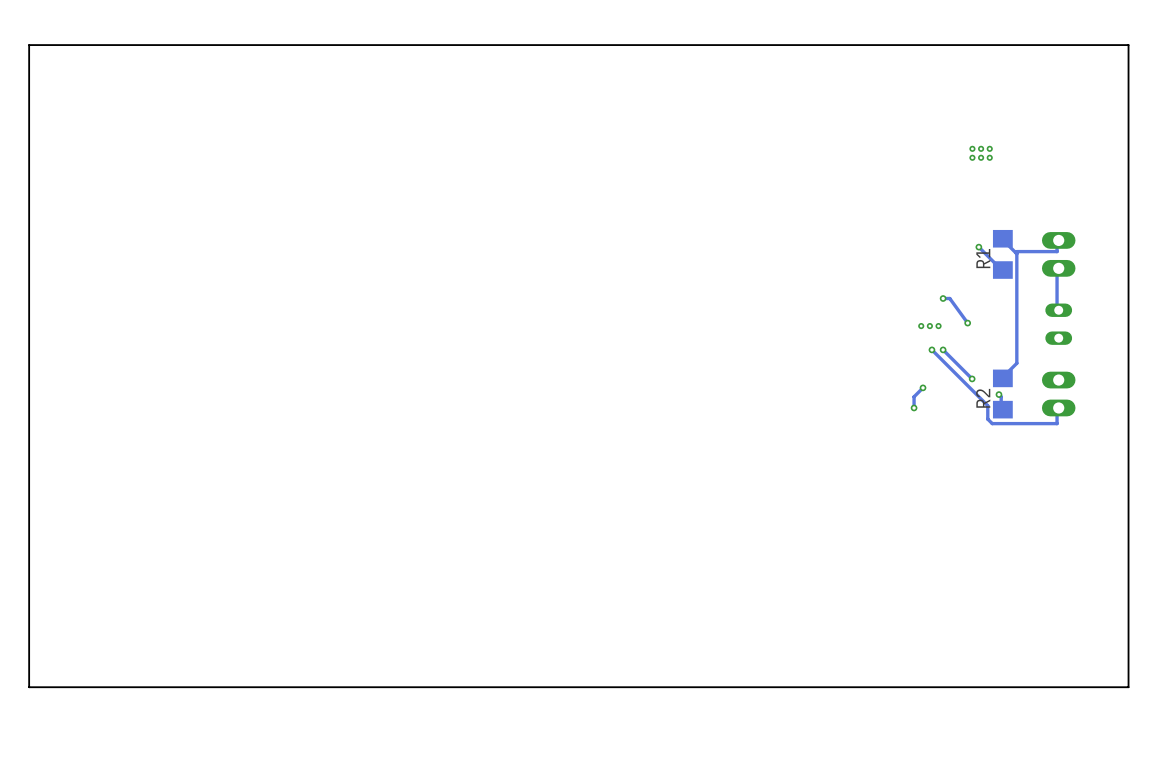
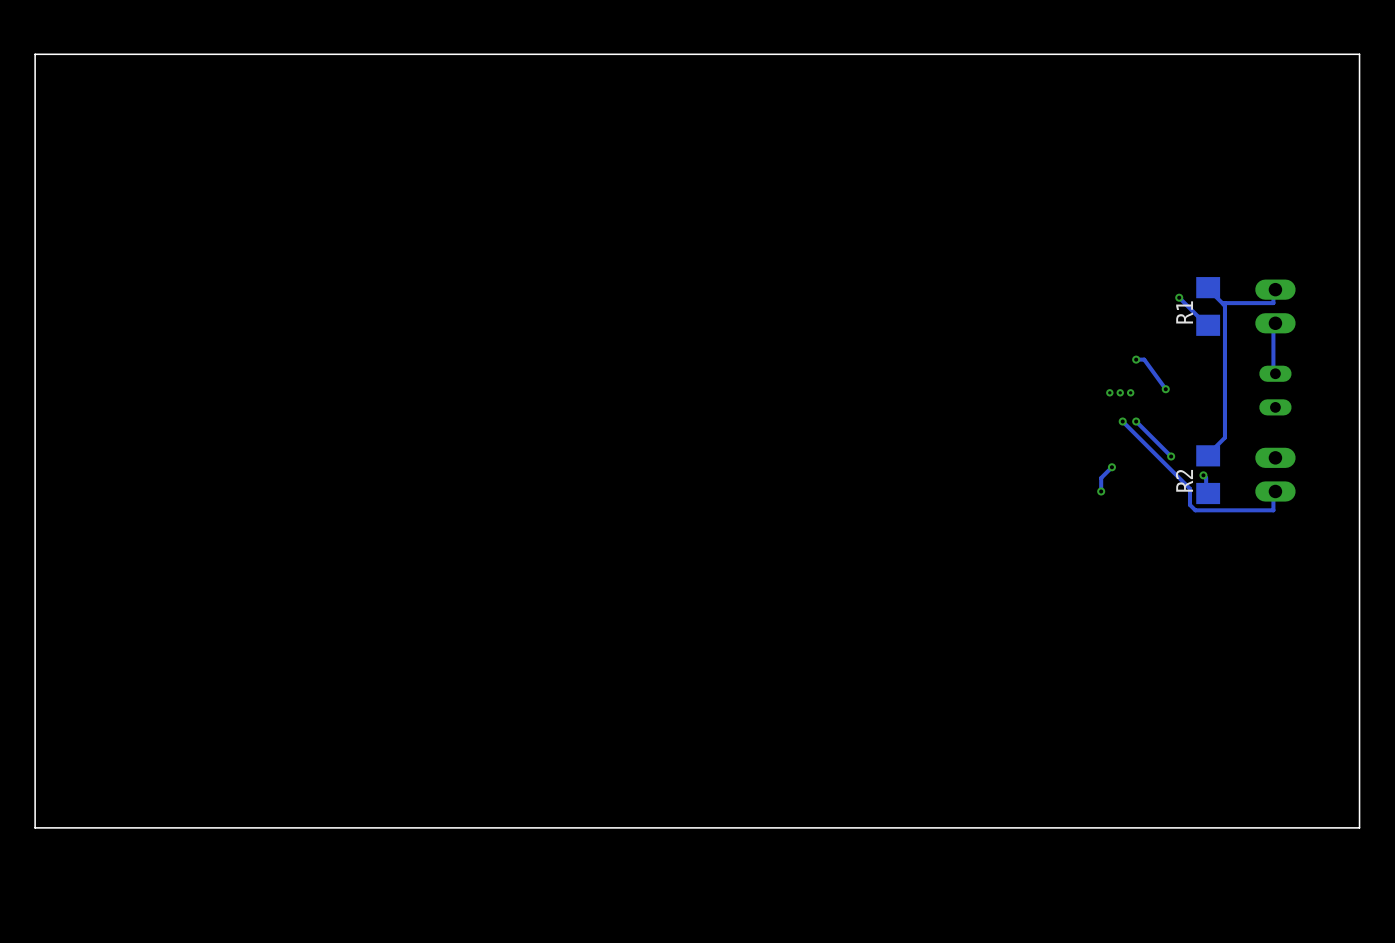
part: (981, 153) -> none

